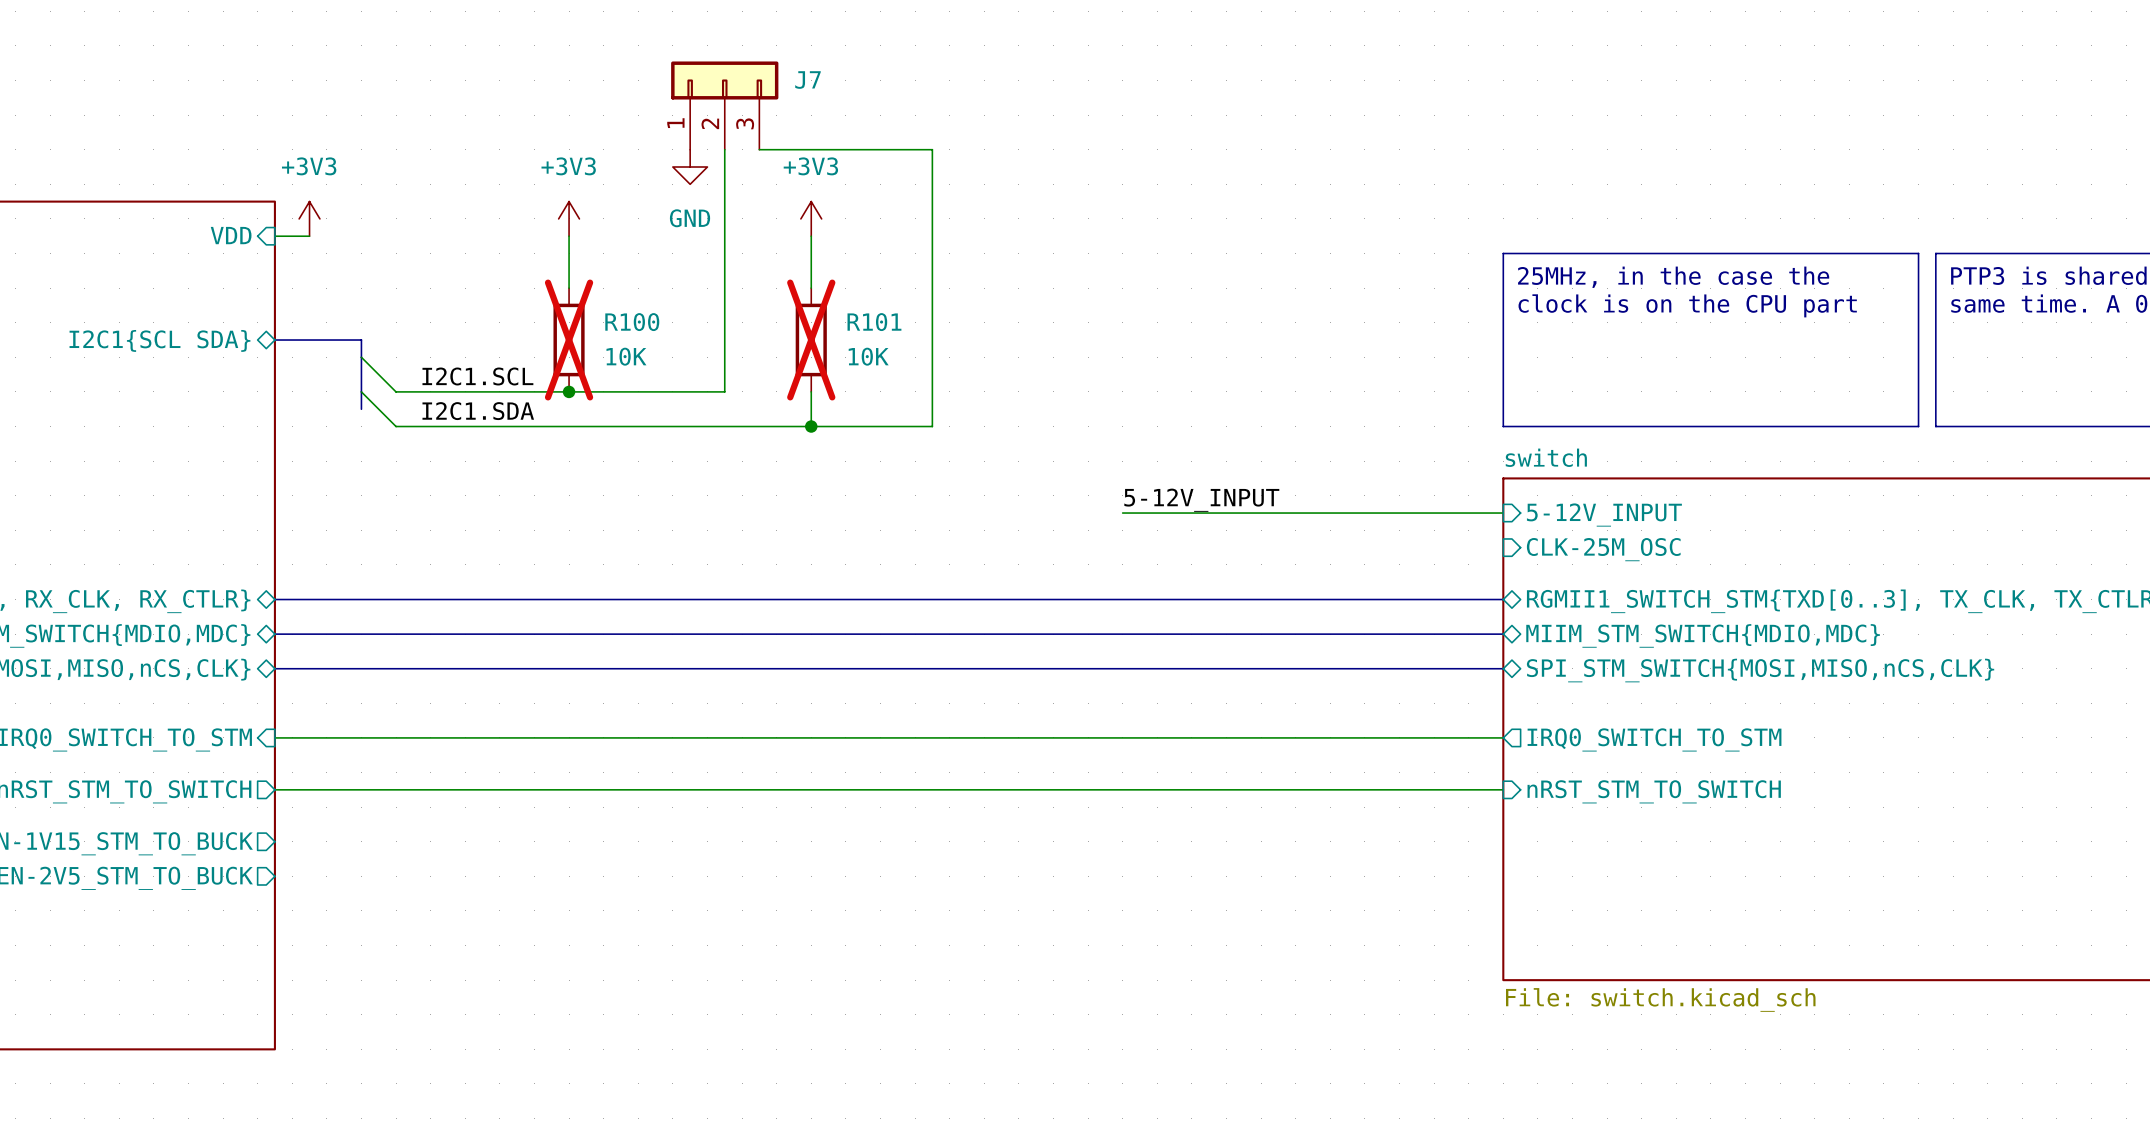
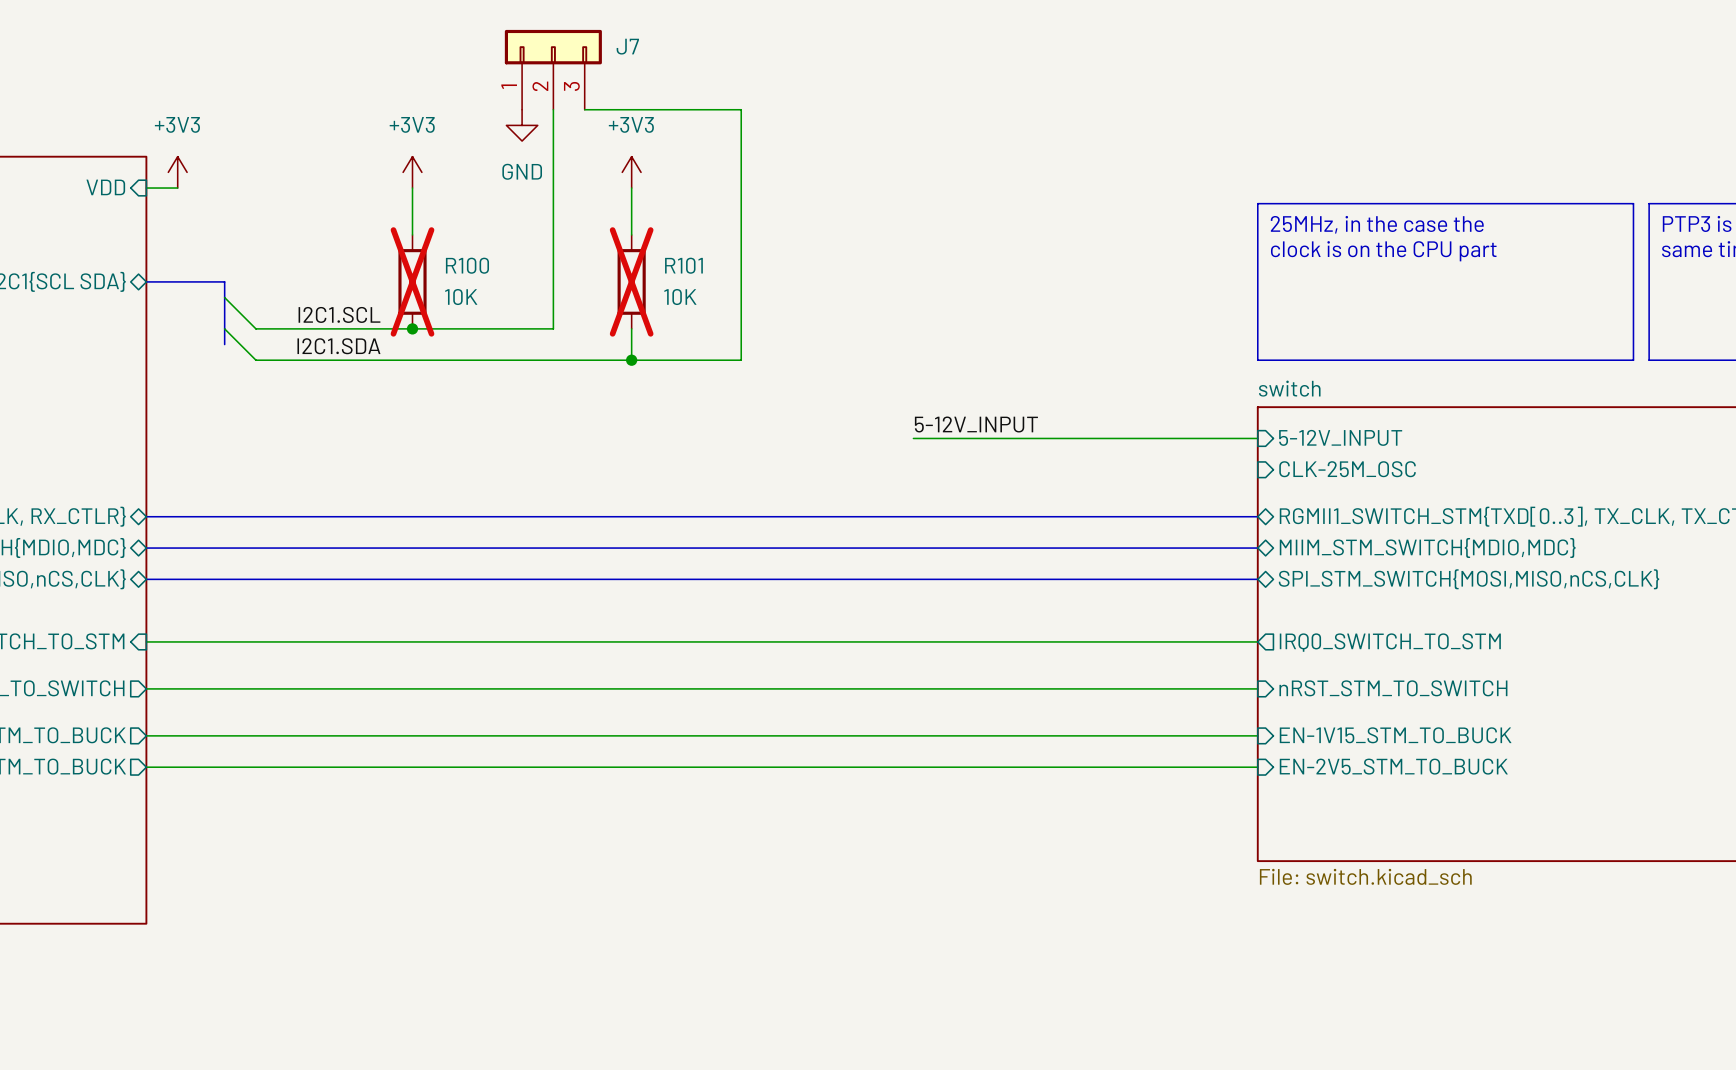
wire: none -> (146, 735) (1257, 735)
sheet pin: none -> EN-1V15_STM_TO_BUCK (1395, 735)
wire: none -> (146, 767) (1257, 767)
sheet pin: none -> EN-2V5_STM_TO_BUCK (1393, 766)

